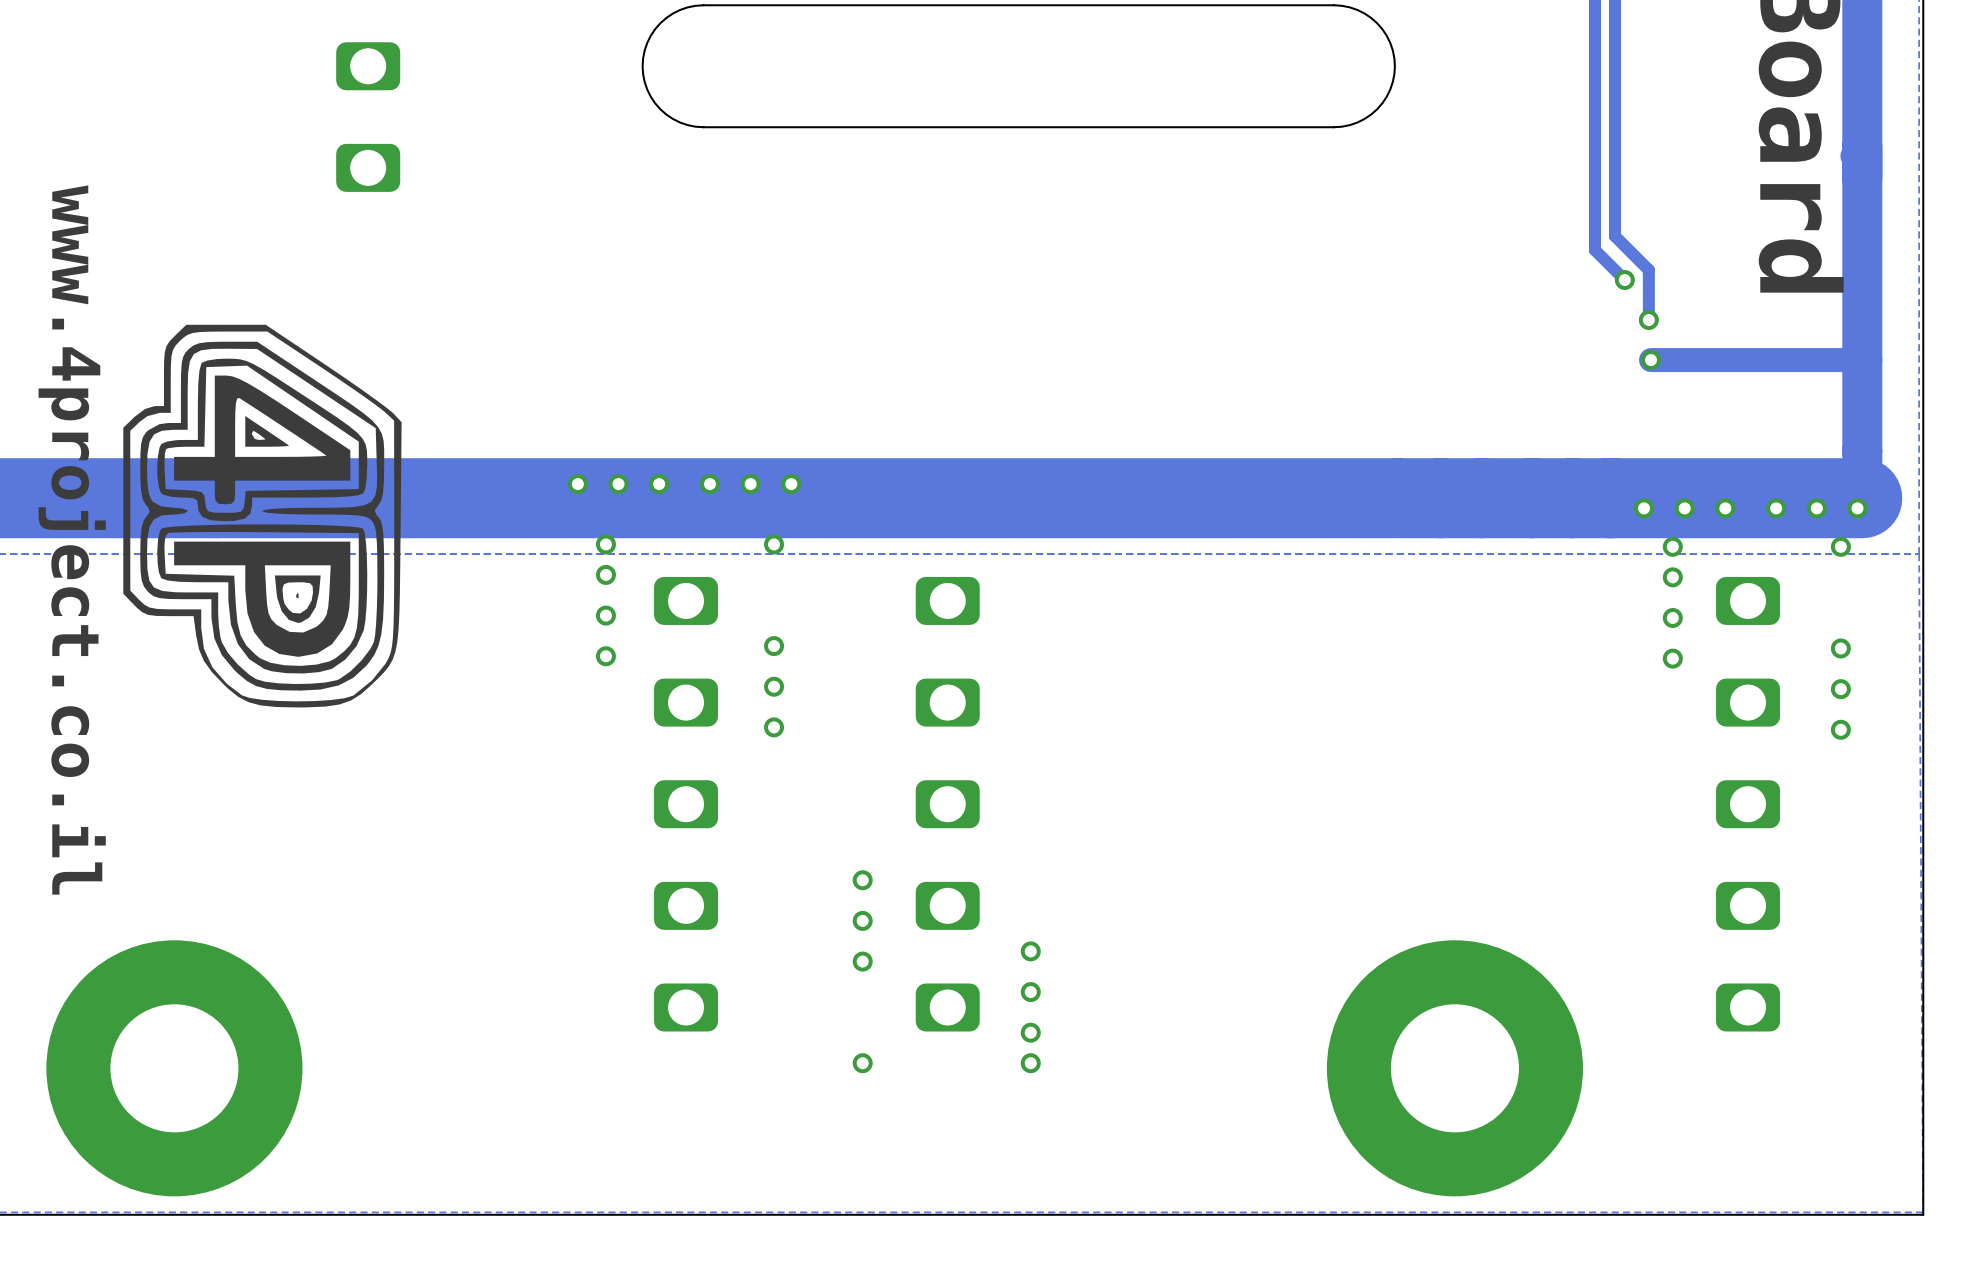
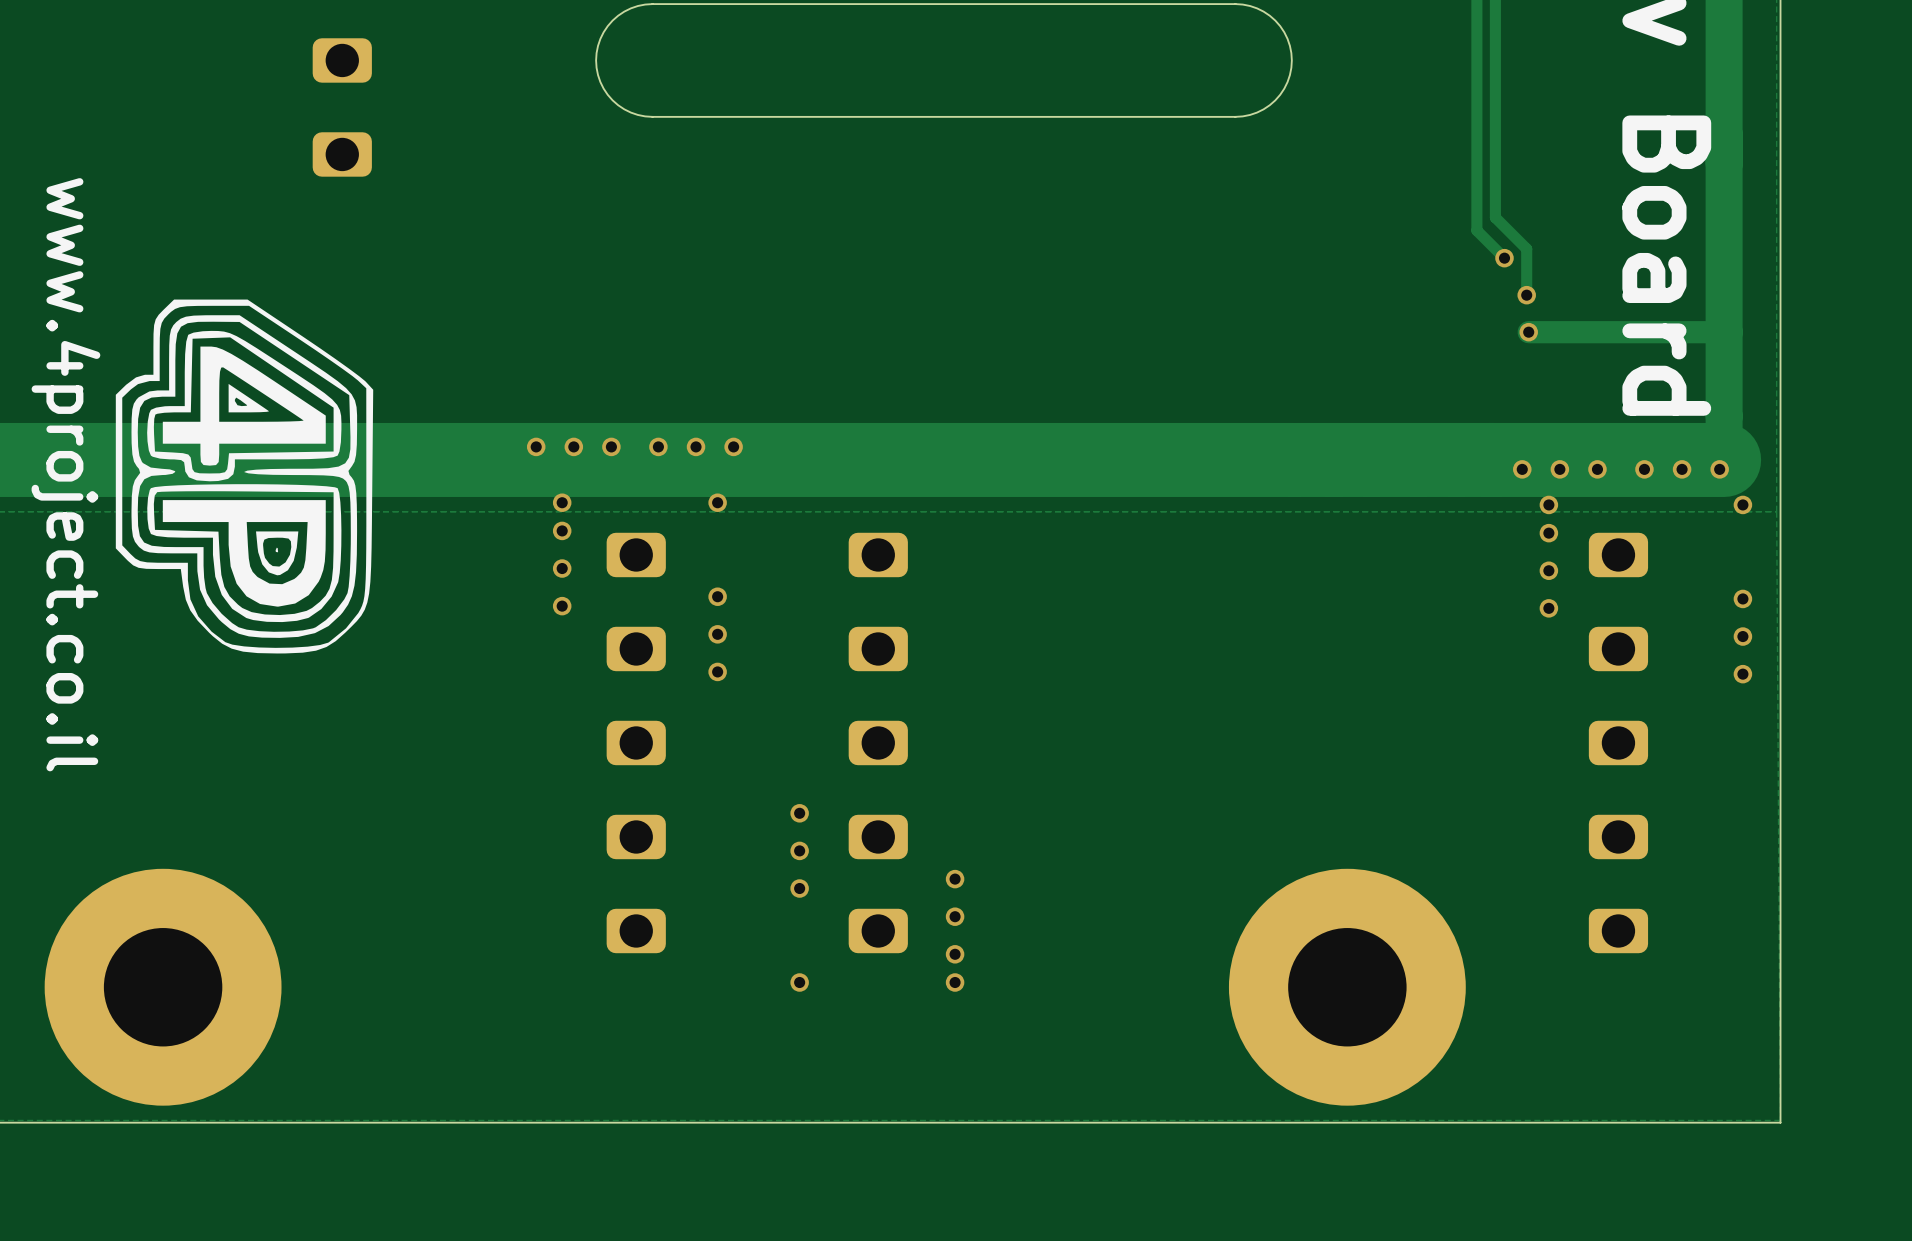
via position: (1840, 546) -> (1742, 504)
via: (1840, 648) -> none
via: none -> (1742, 598)
via: (1840, 689) -> none
via: none -> (1742, 636)
via: (1840, 729) -> none
via: none -> (1742, 674)

